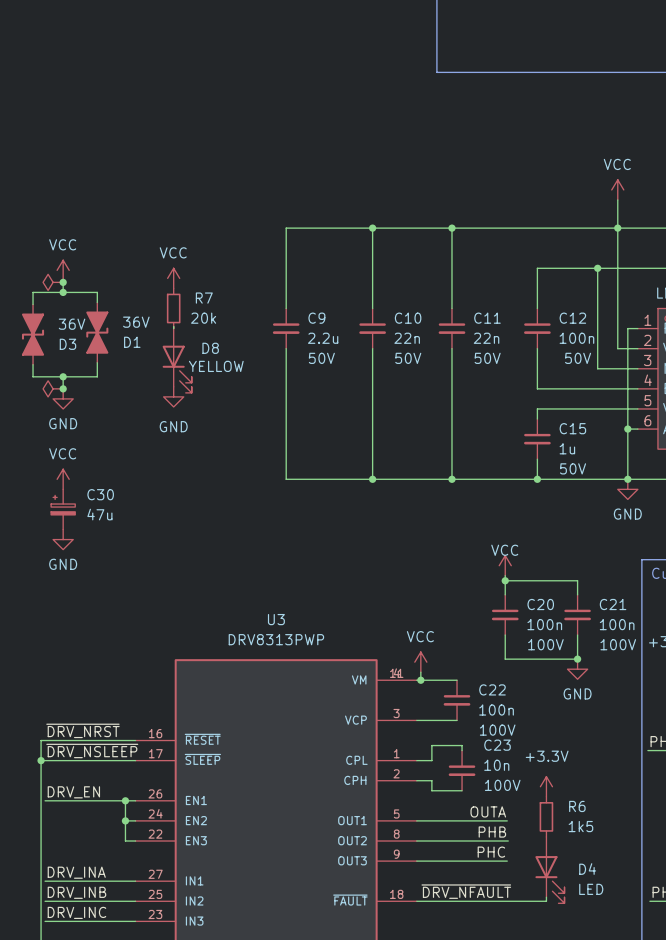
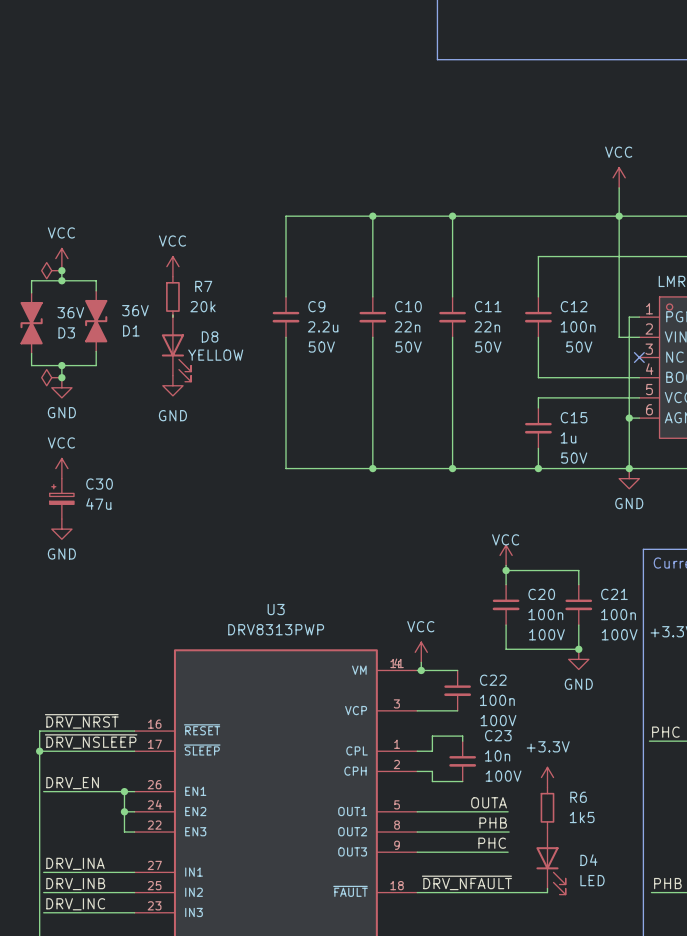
wire: (597, 268) (597, 368) (637, 368) -> none
junction: (597, 268) -> none
no-connect mark: none -> (639, 357)

